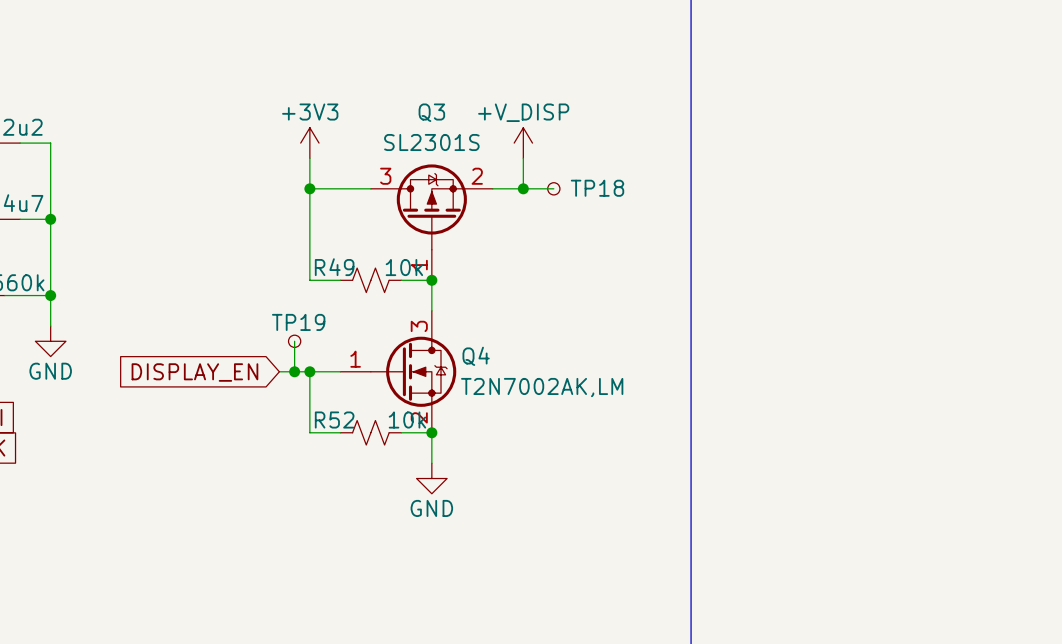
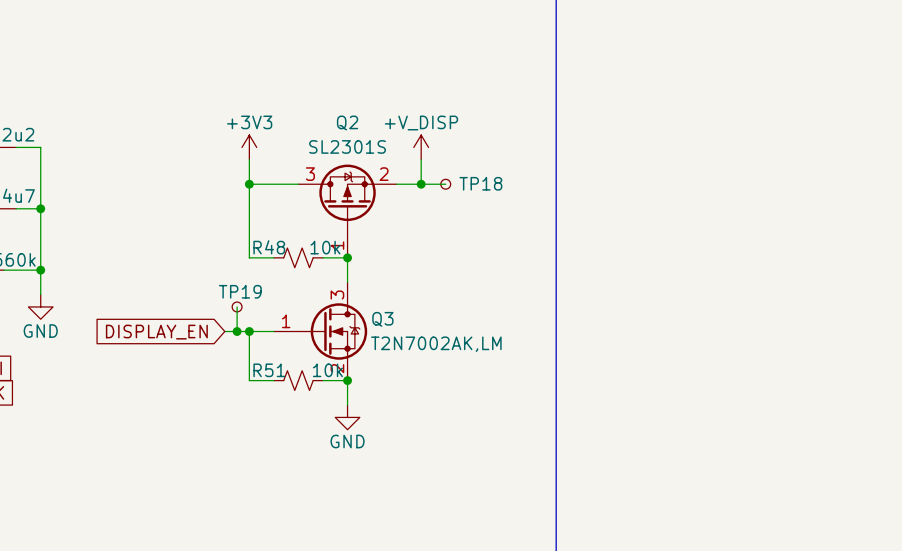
Q3 name: Q3 (431, 112) -> Q2 (347, 123)
R49 name: R49 (334, 267) -> R48 (269, 247)
Q4 name: Q4 (476, 356) -> Q3 (382, 319)
R52 name: R52 (334, 420) -> R51 (269, 370)

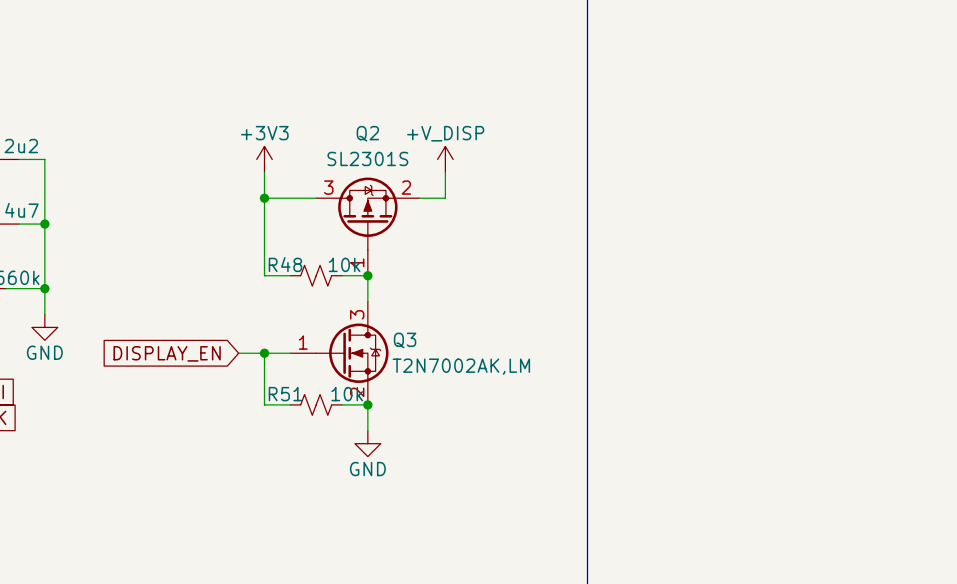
wire: (421, 184) (445, 184) -> none
junction: (421, 184) -> none
TP18: (445, 184) -> none
wire: (237, 306) (237, 331) -> none
TP19: (237, 306) -> none
junction: (237, 331) -> none

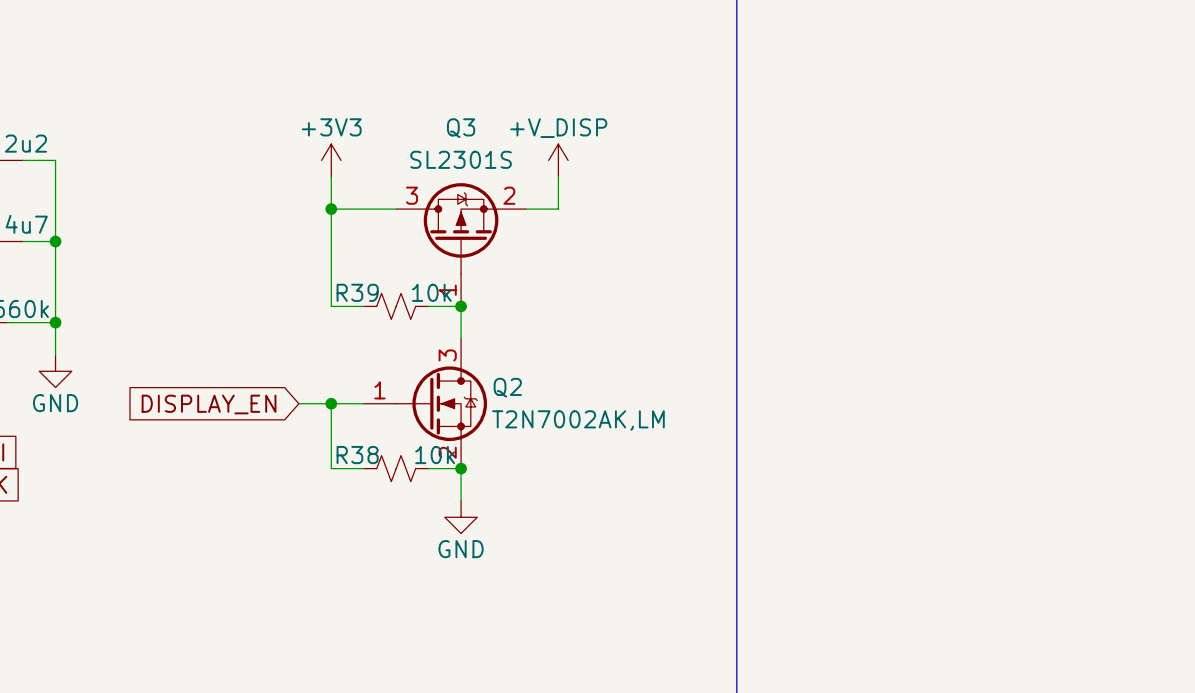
Q2 name: Q2 (367, 133) -> Q3 (461, 128)
R48 name: R48 (285, 264) -> R39 (357, 292)
Q3 name: Q3 (405, 340) -> Q2 (507, 387)
R51 name: R51 (285, 394) -> R38 (357, 455)

